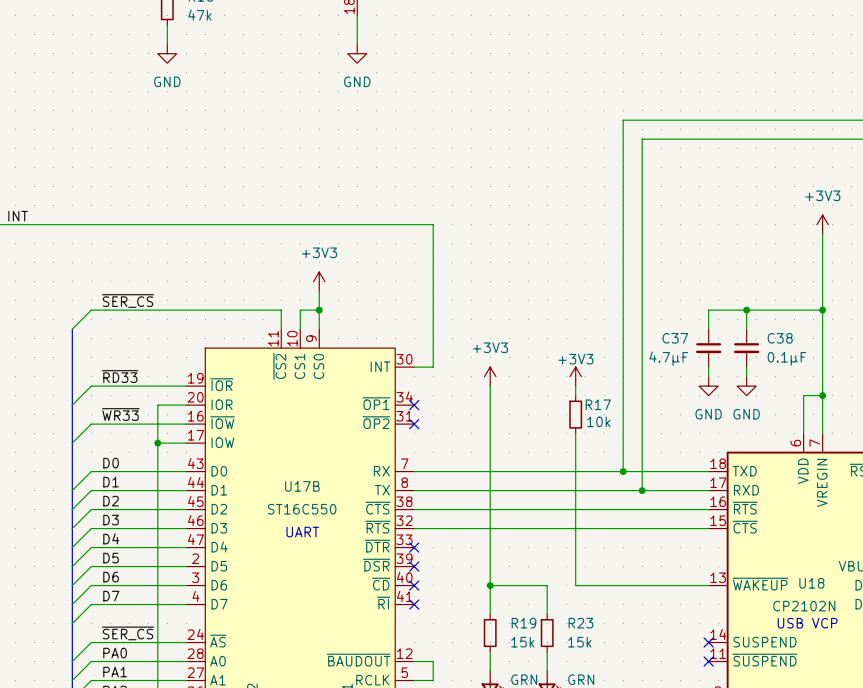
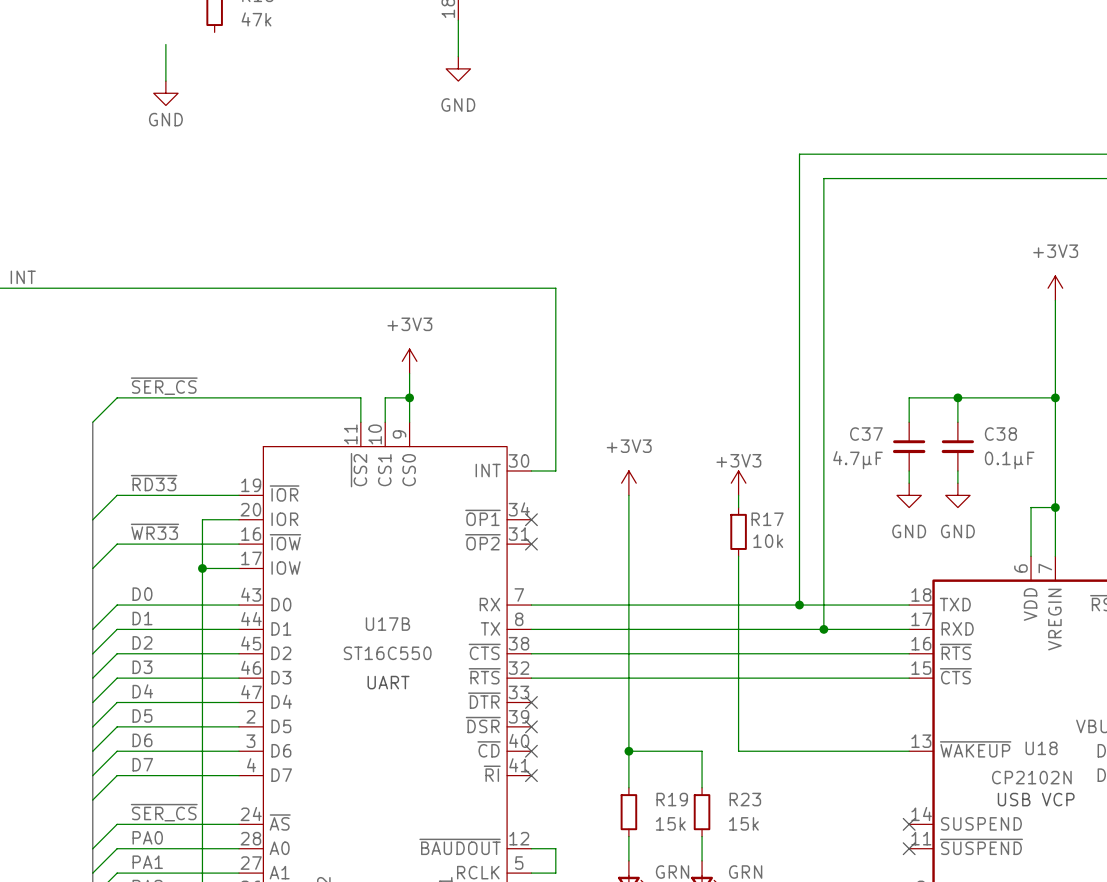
wire: (167, 25) (167, 44) -> none
wire: none -> (165, 44) (165, 81)
power symbol position: GND (167, 53) -> GND (165, 93)
power symbol text position: GND (167, 81) -> GND (165, 119)

